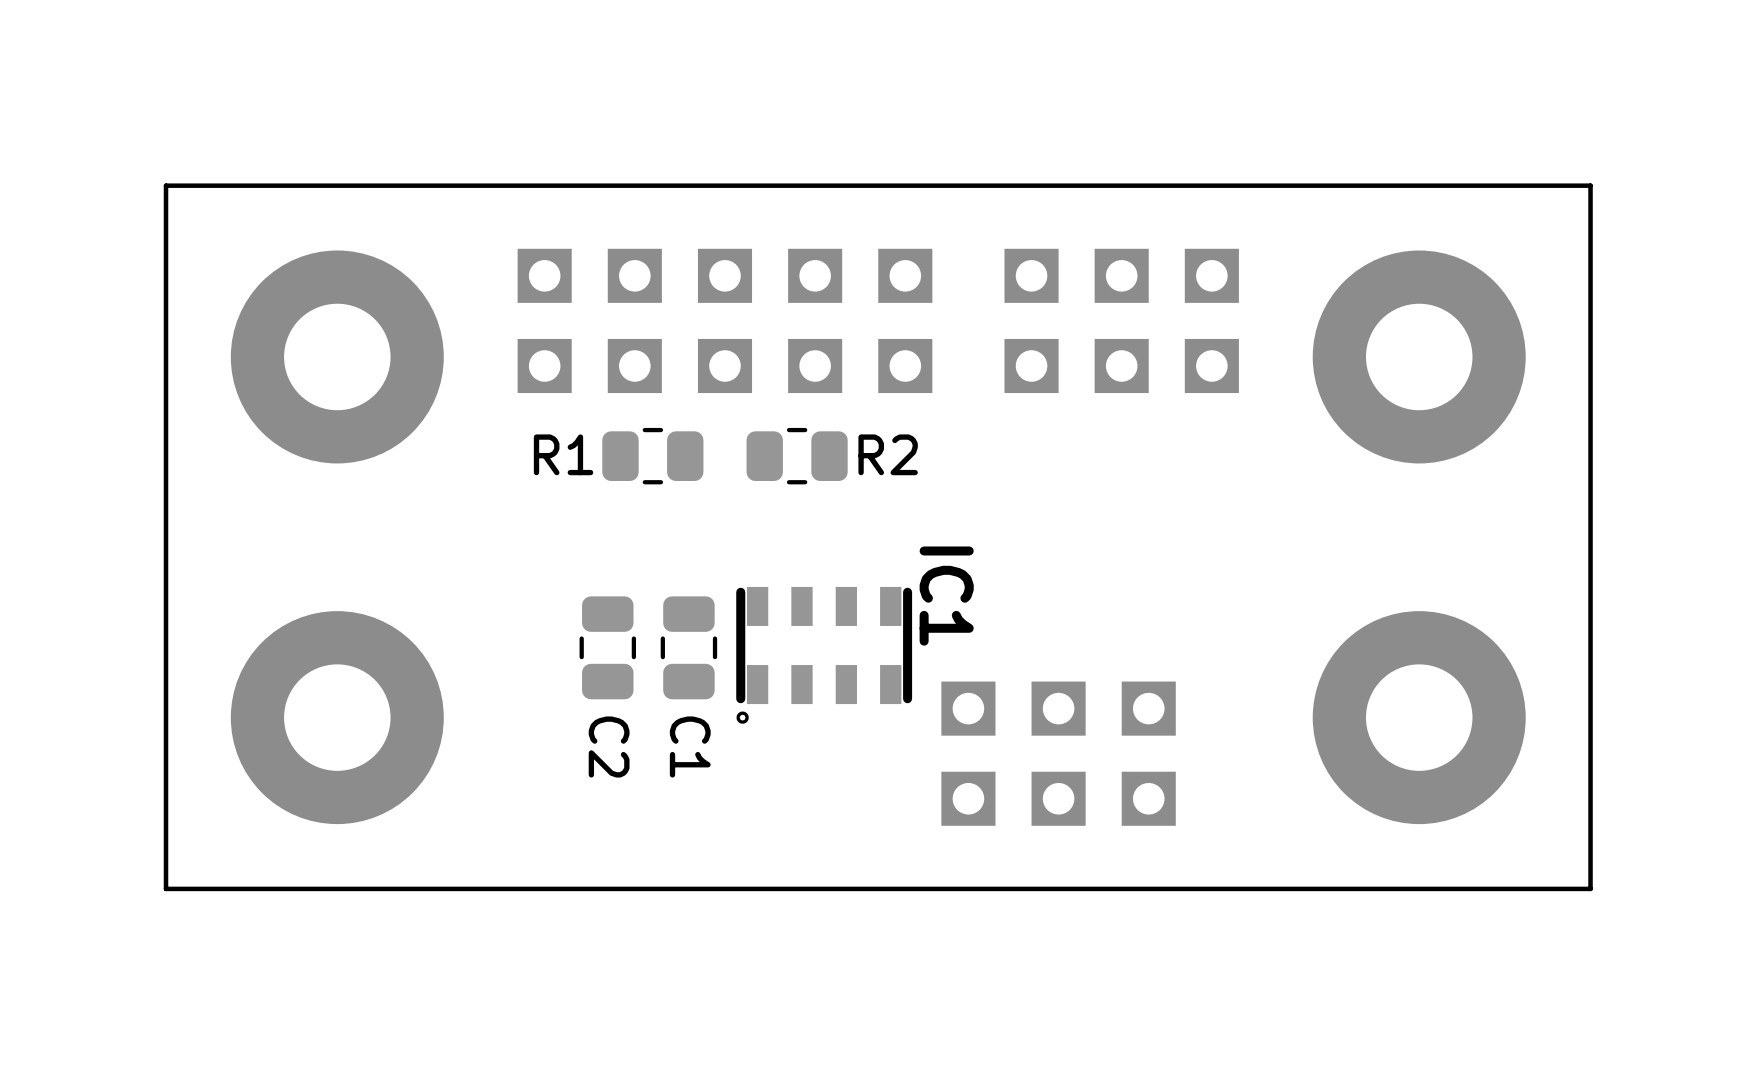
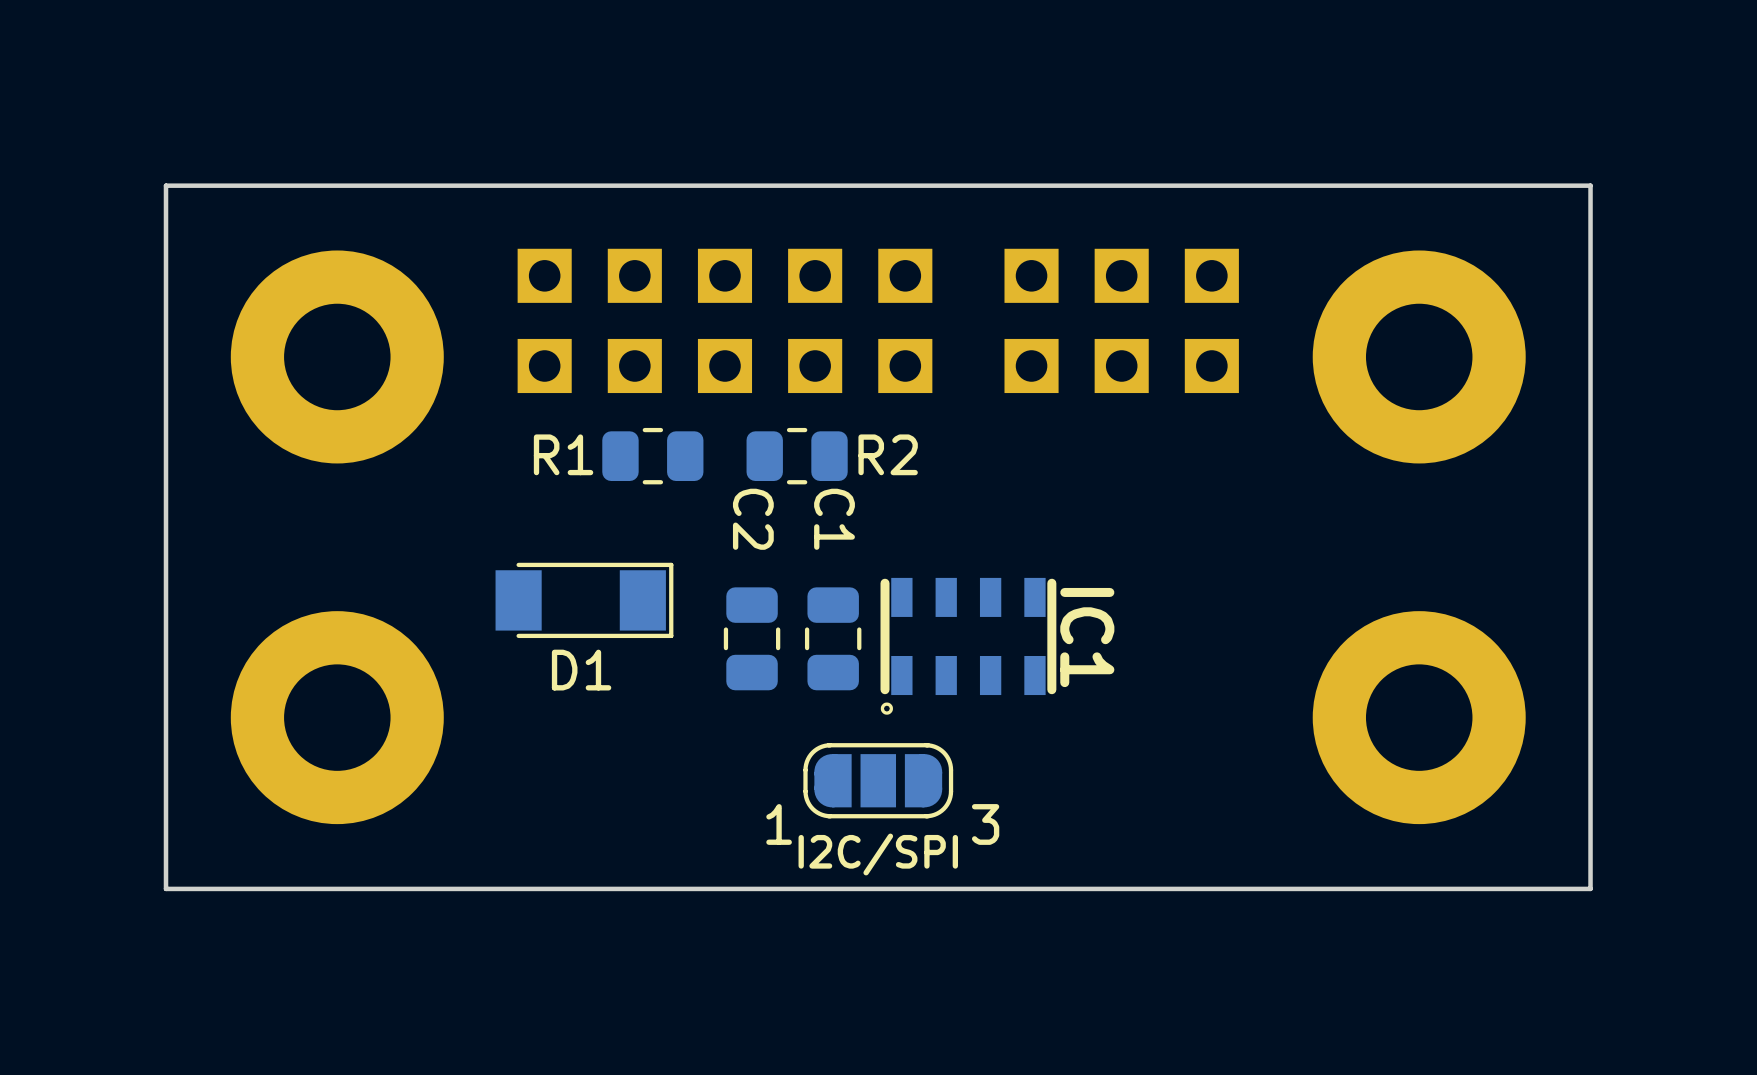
IC1 name position: IC1 (946, 596) -> IC1 (1087, 637)
D1: none -> (584, 600)
C2 position: (607, 647) -> (752, 638)
C1 position: (688, 647) -> (833, 638)
IC1 position: (824, 655) -> (968, 646)
C2 name position: C2 (609, 747) -> C2 (753, 519)
C1 name position: C1 (690, 747) -> C1 (834, 519)
part: (1058, 753) -> none
part: none -> (878, 780)
text: none -> I2C/SPI (878, 854)

